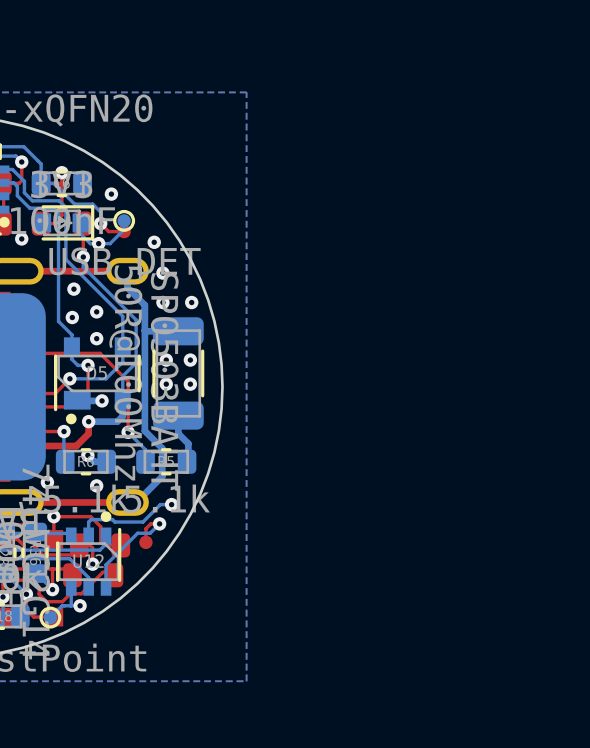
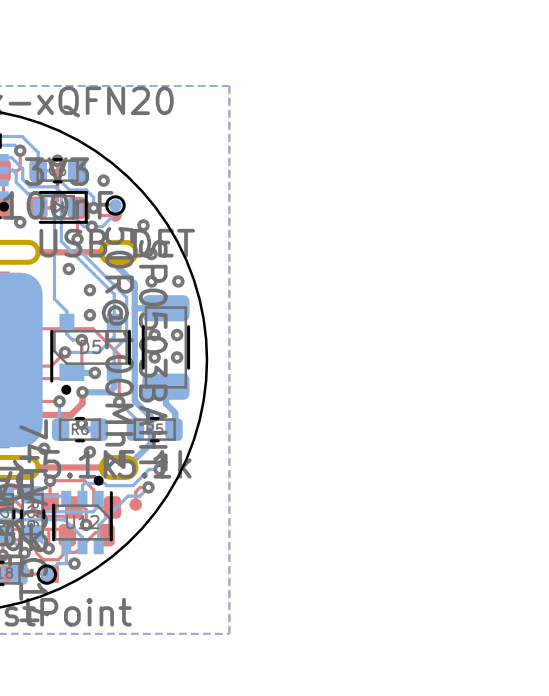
via: (72, 317) -> none

